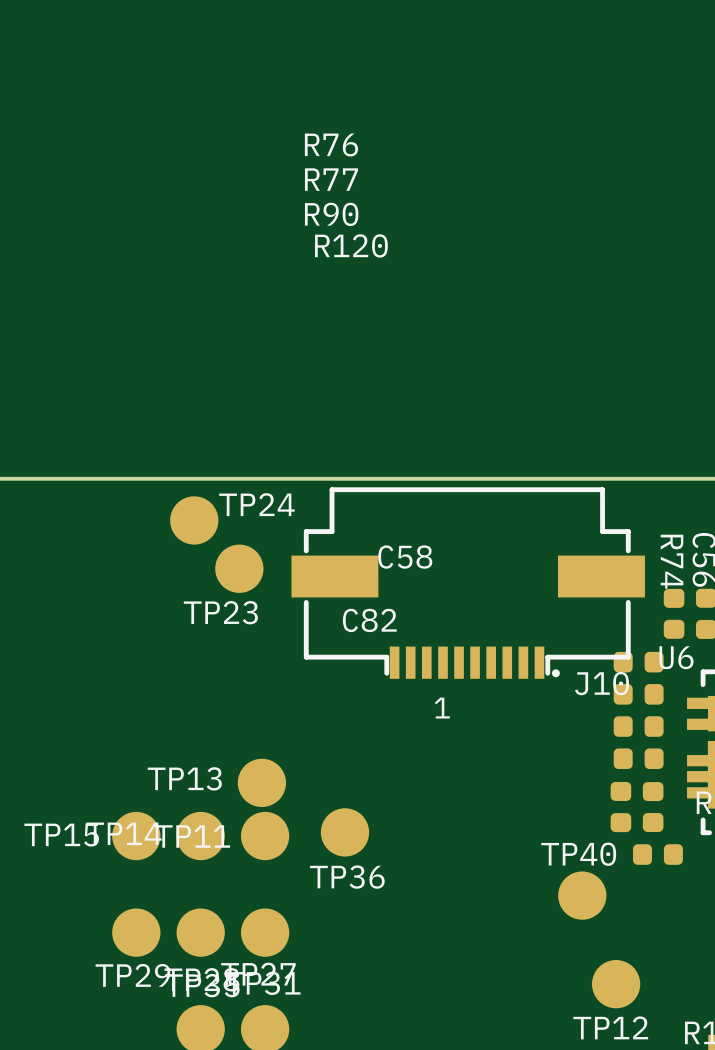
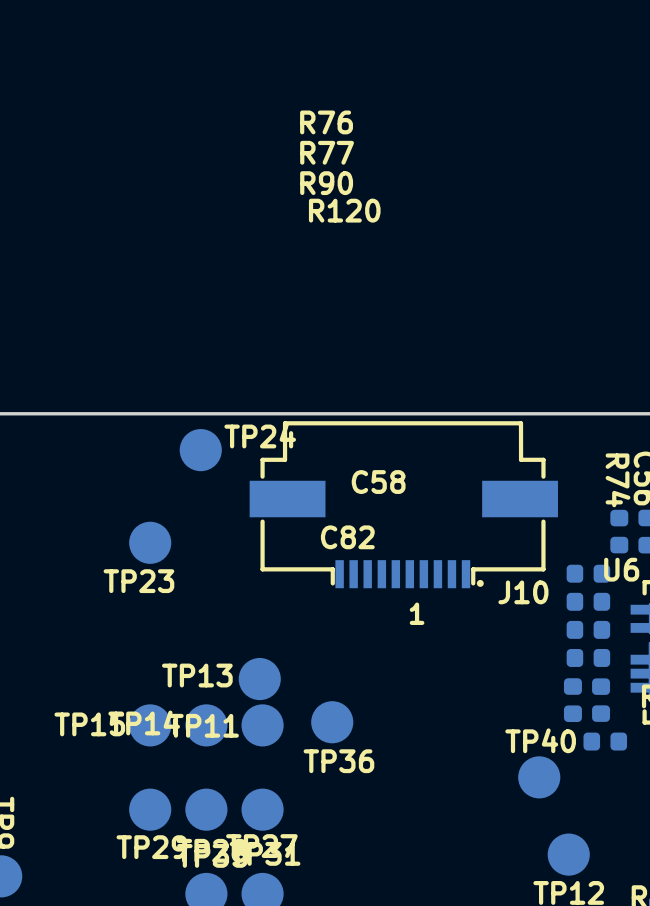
TP23 position: (239, 568) -> (150, 542)
J10 position: (468, 583) -> (403, 504)

